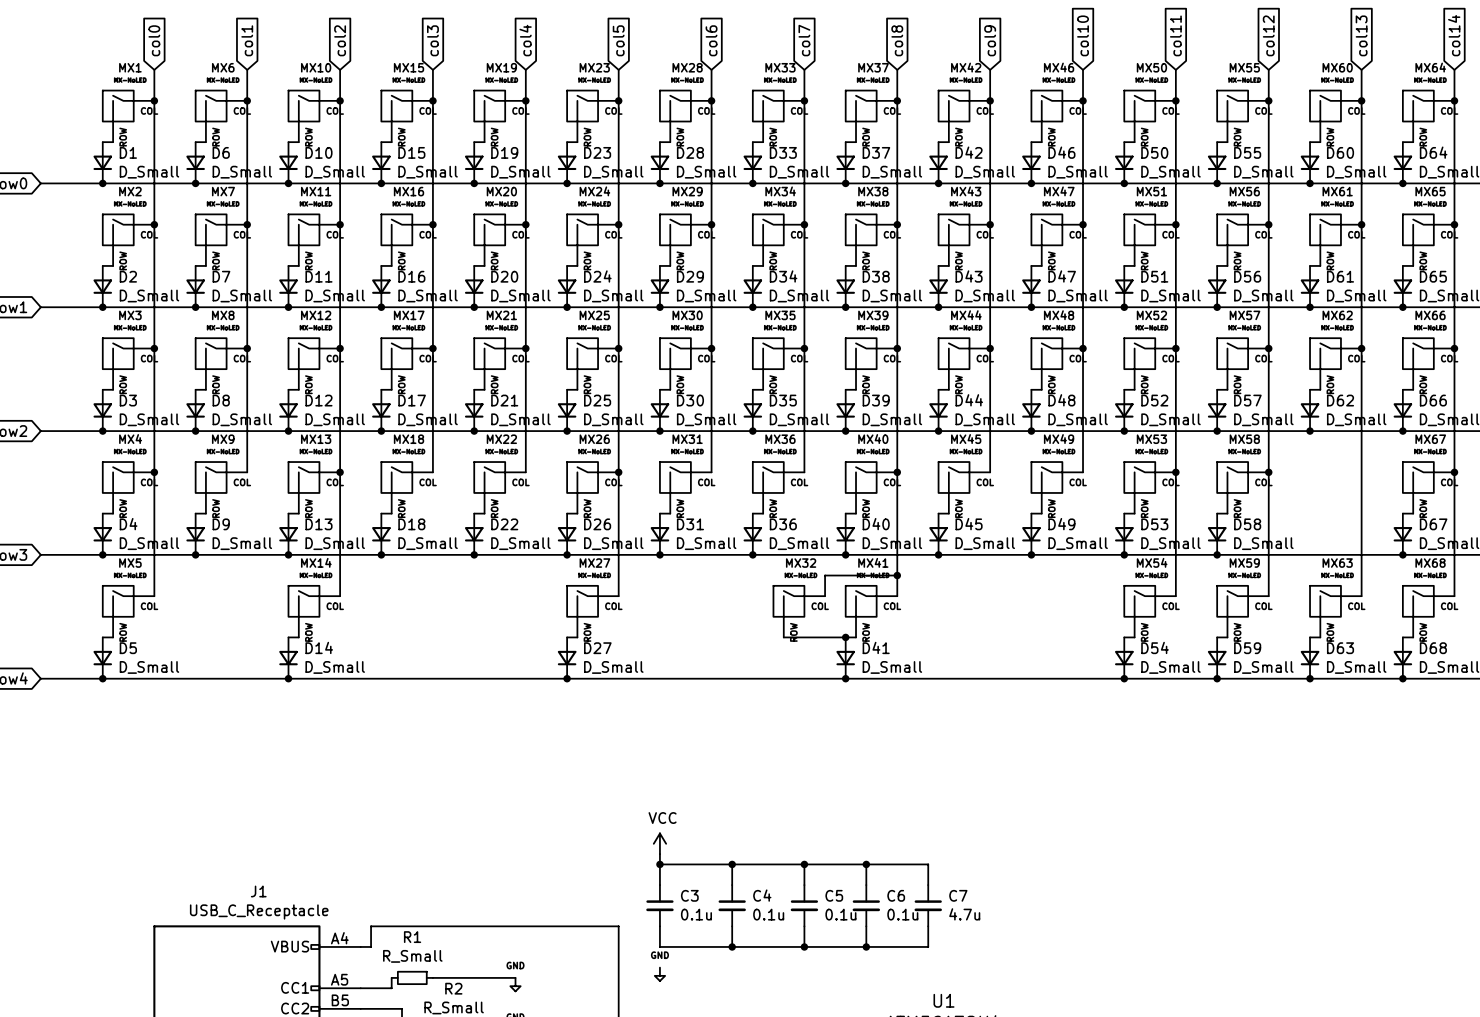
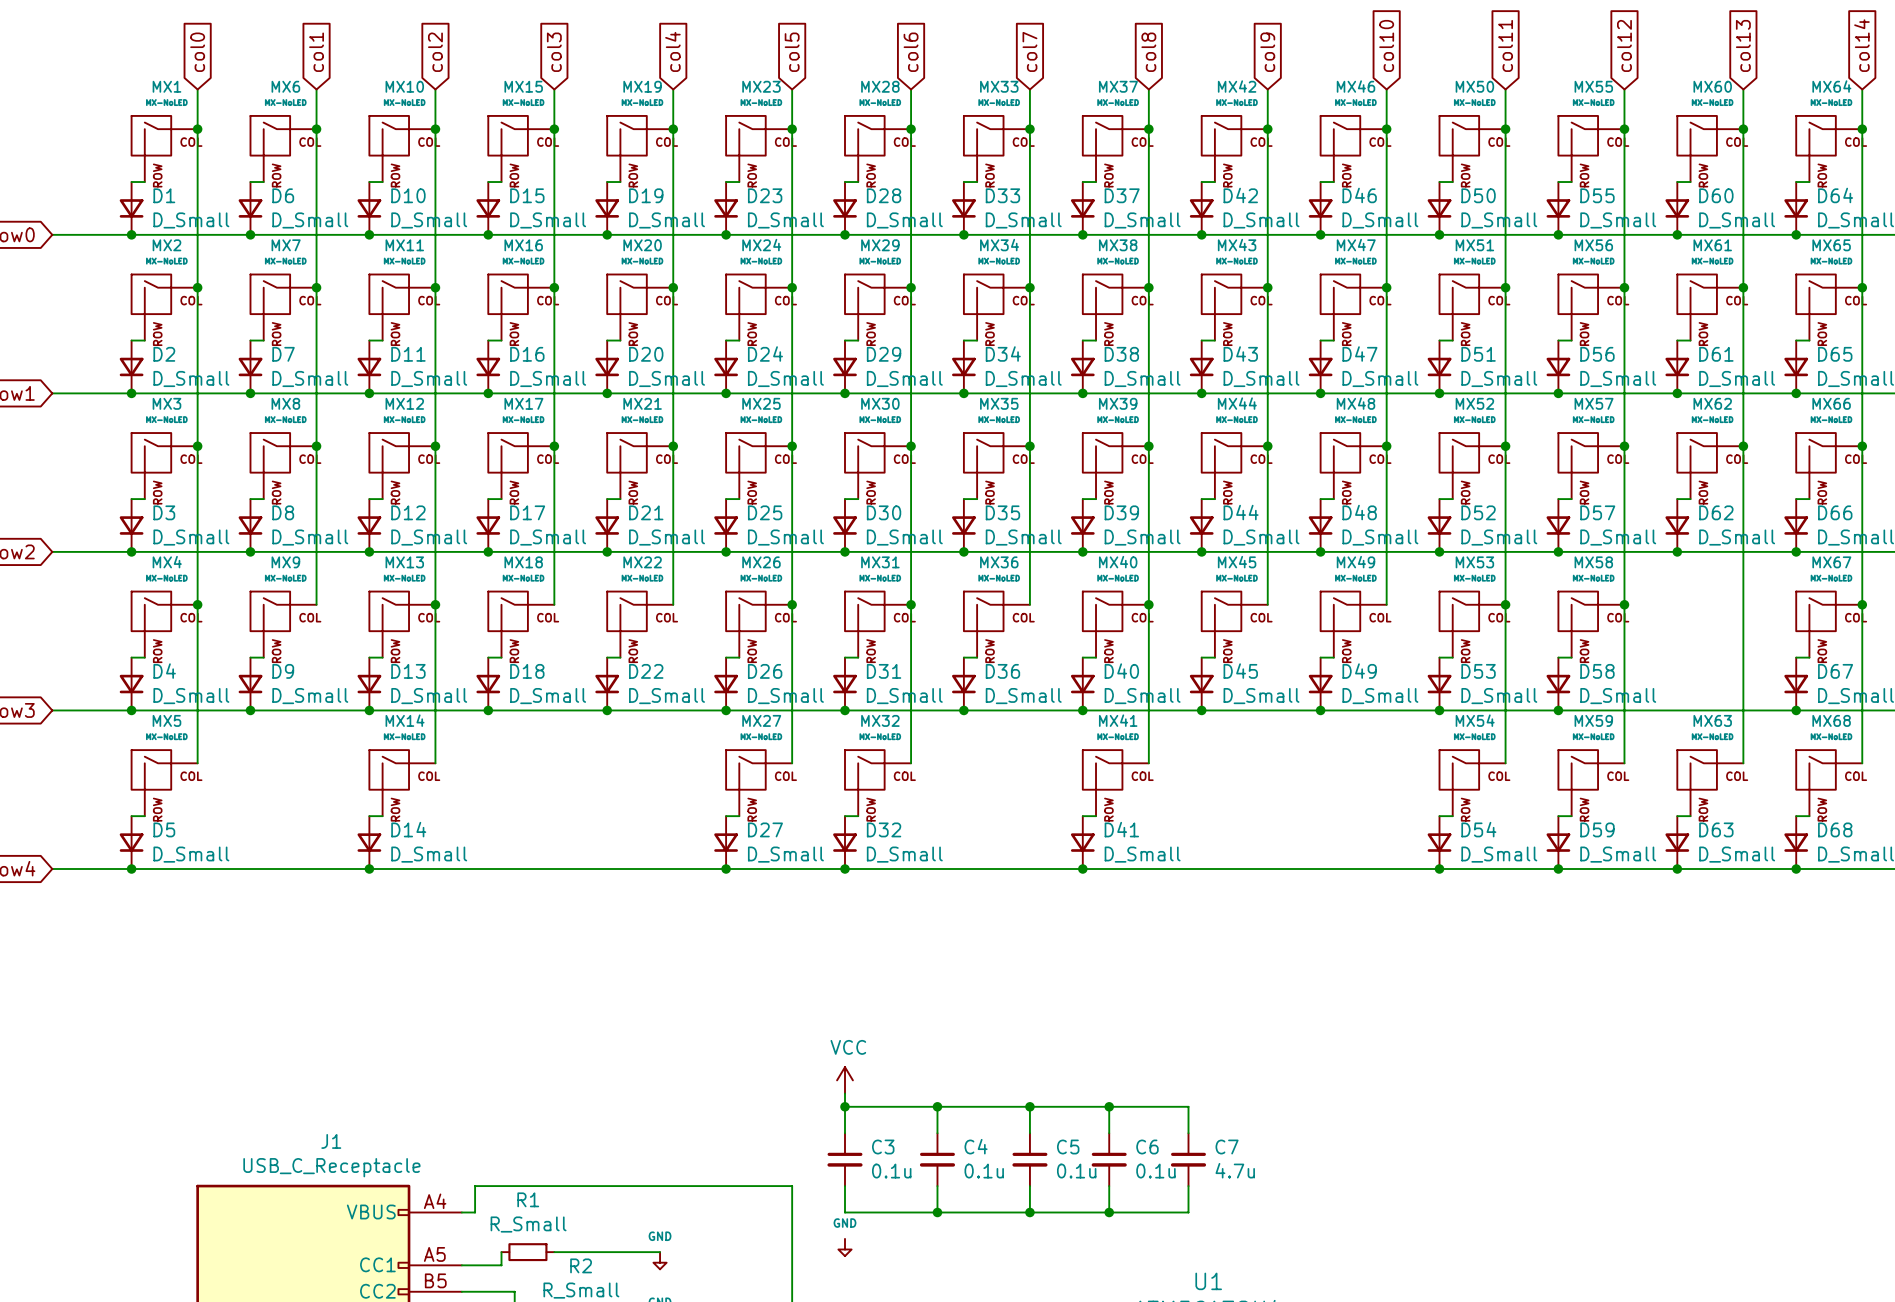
wire: none -> (911, 604) (911, 763)
junction: none -> (911, 604)
wire: (897, 575) (825, 575) (825, 596) -> none
junction: (897, 575) -> none
MX32 position: (799, 611) -> (878, 783)
wire: none -> (844, 816) (858, 816)
wire: (783, 637) (845, 637) -> none
junction: (845, 637) -> none
D32: none -> D_Small (844, 842)
junction: none -> (844, 869)

